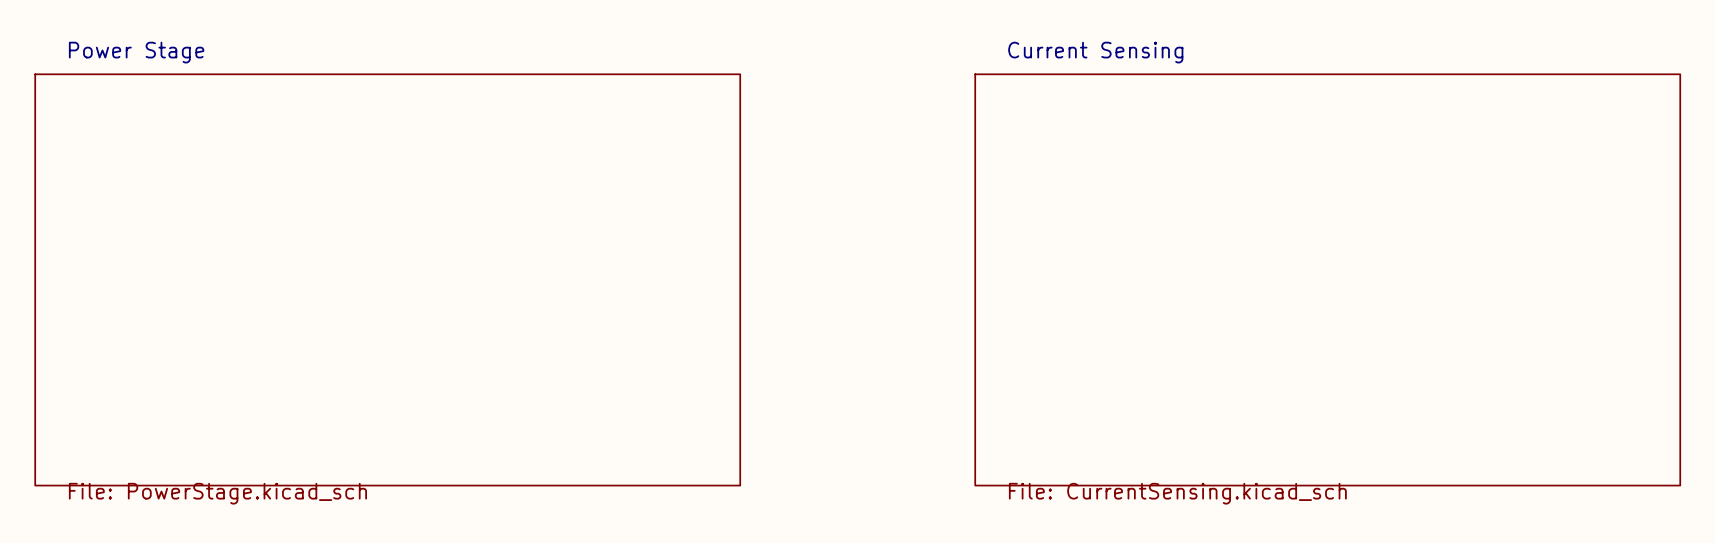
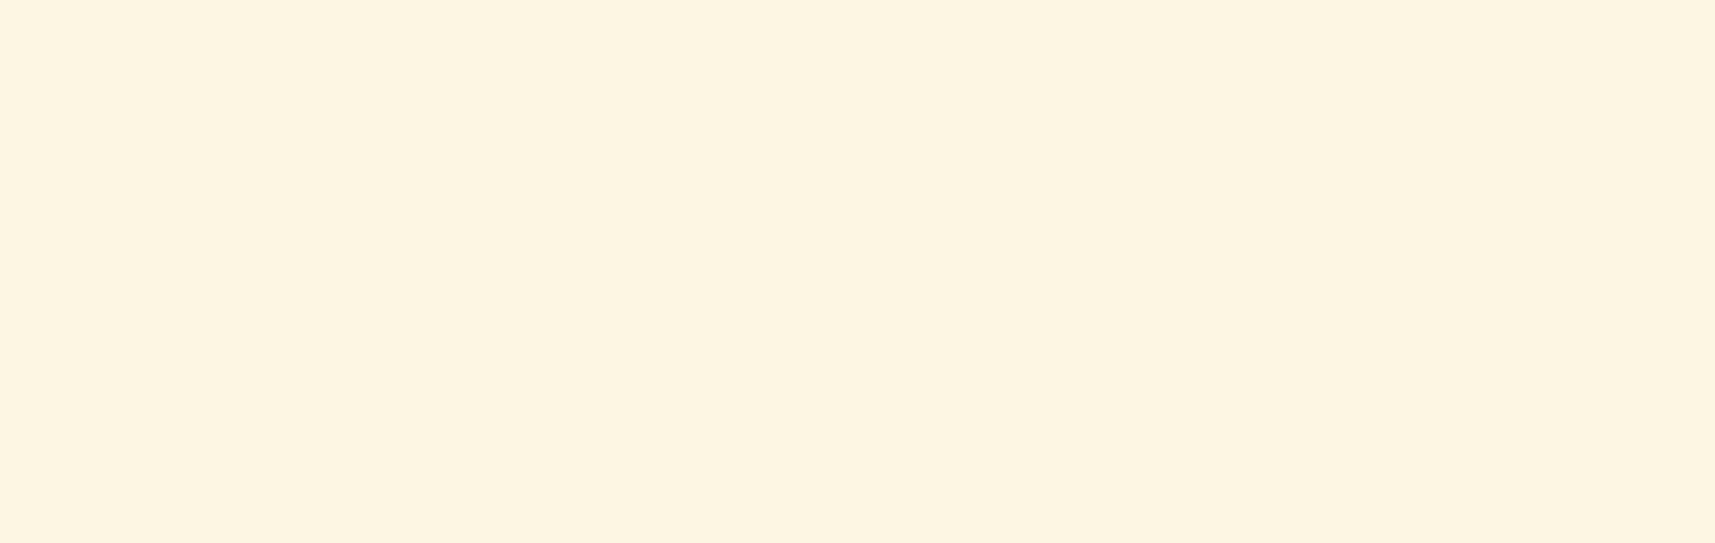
sheet Power Stage: File: PowerStage.kicad_sch (387, 279) -> none
sheet Current Sensing: File: CurrentSensing.kicad_sch (1327, 279) -> none

